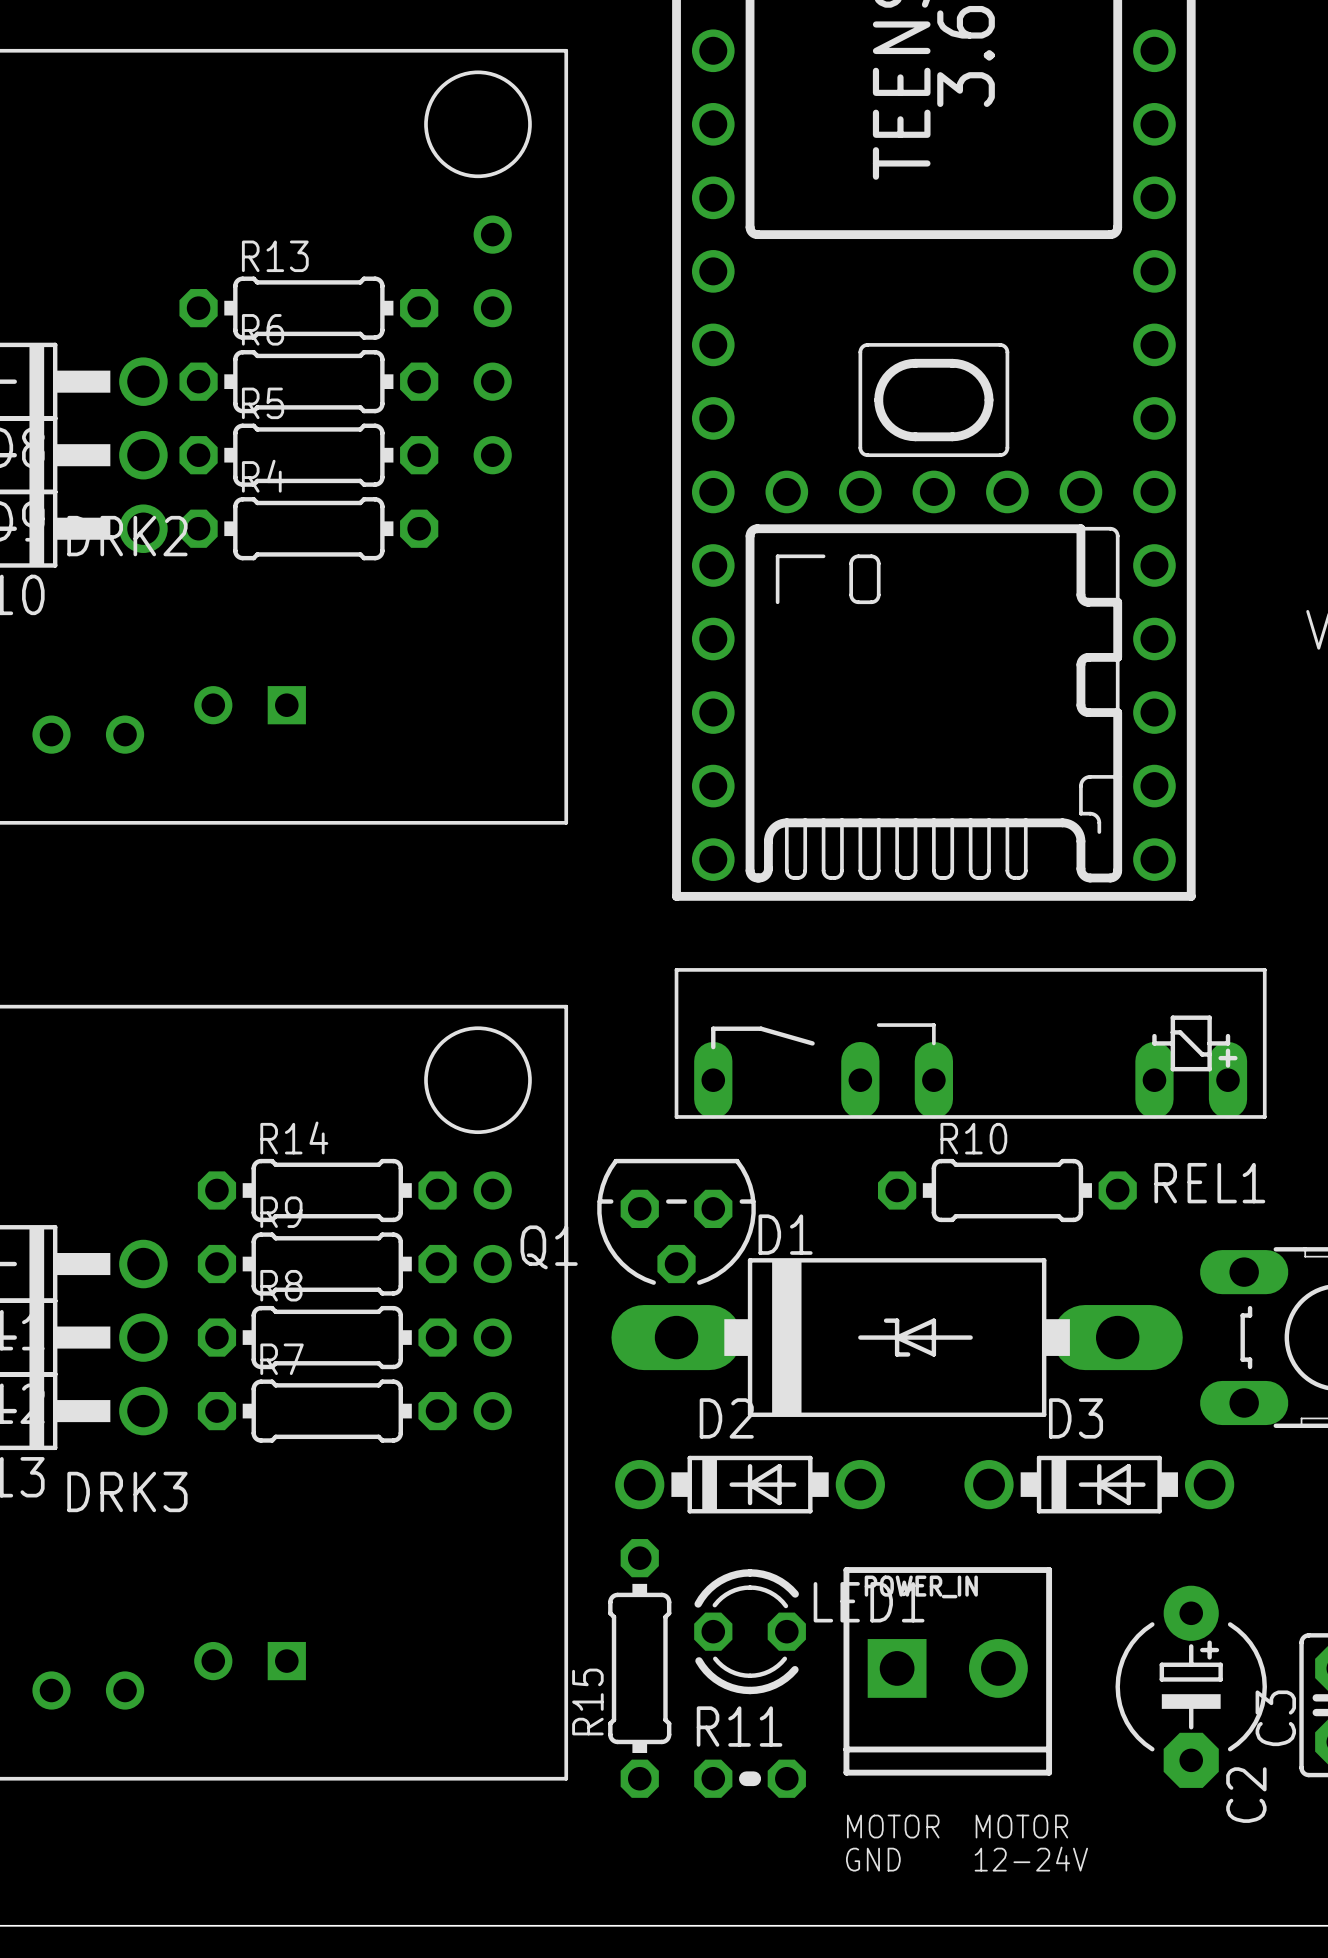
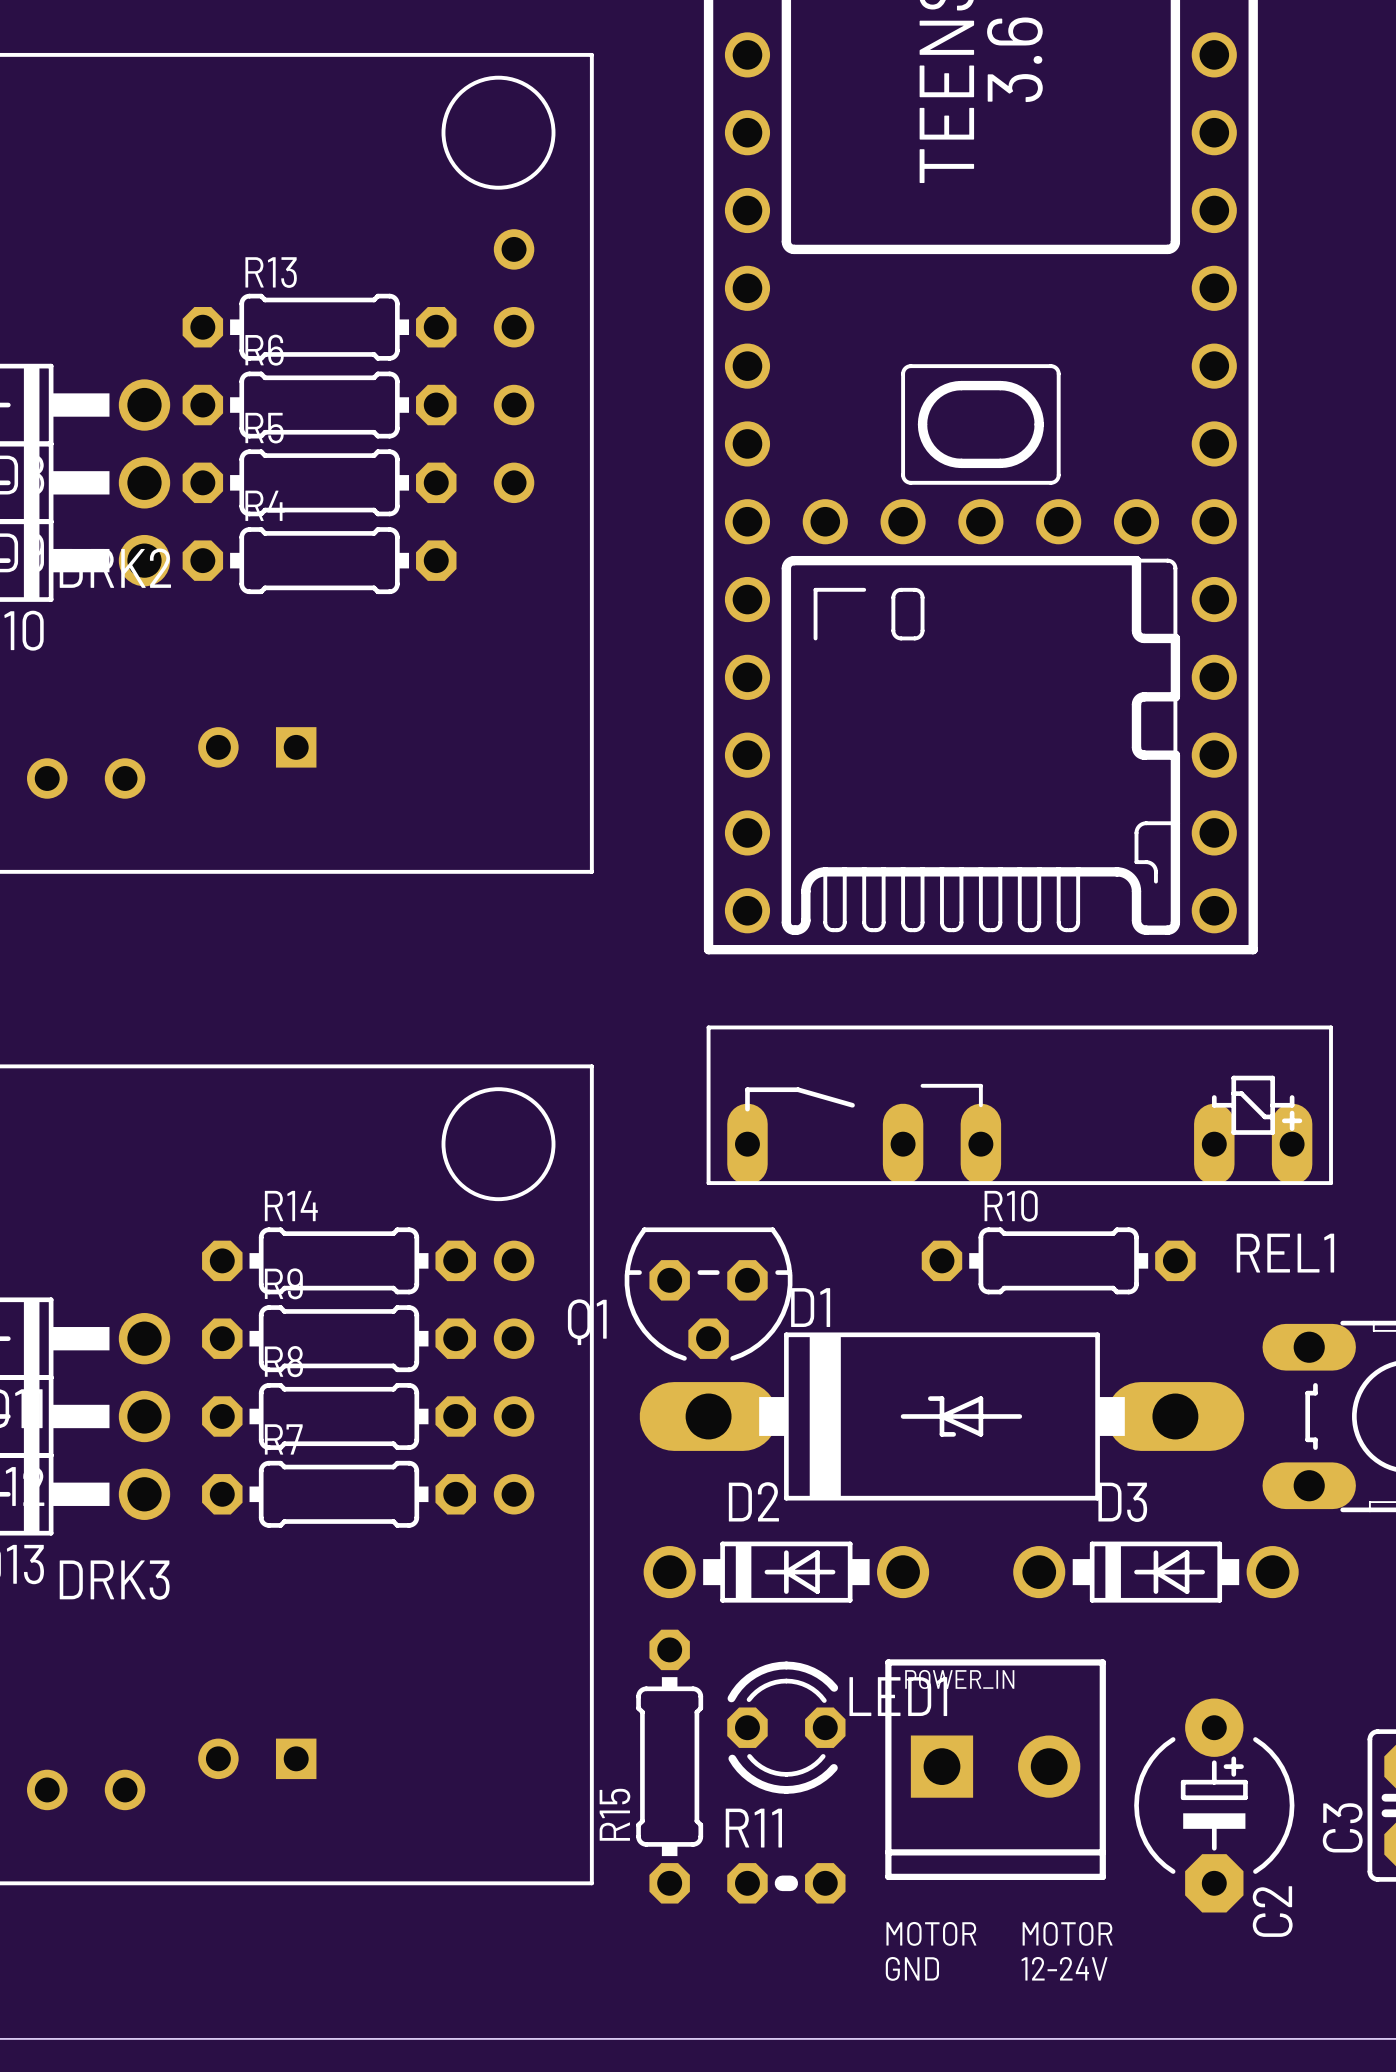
C2 position: (1191, 1686) -> (1214, 1805)

